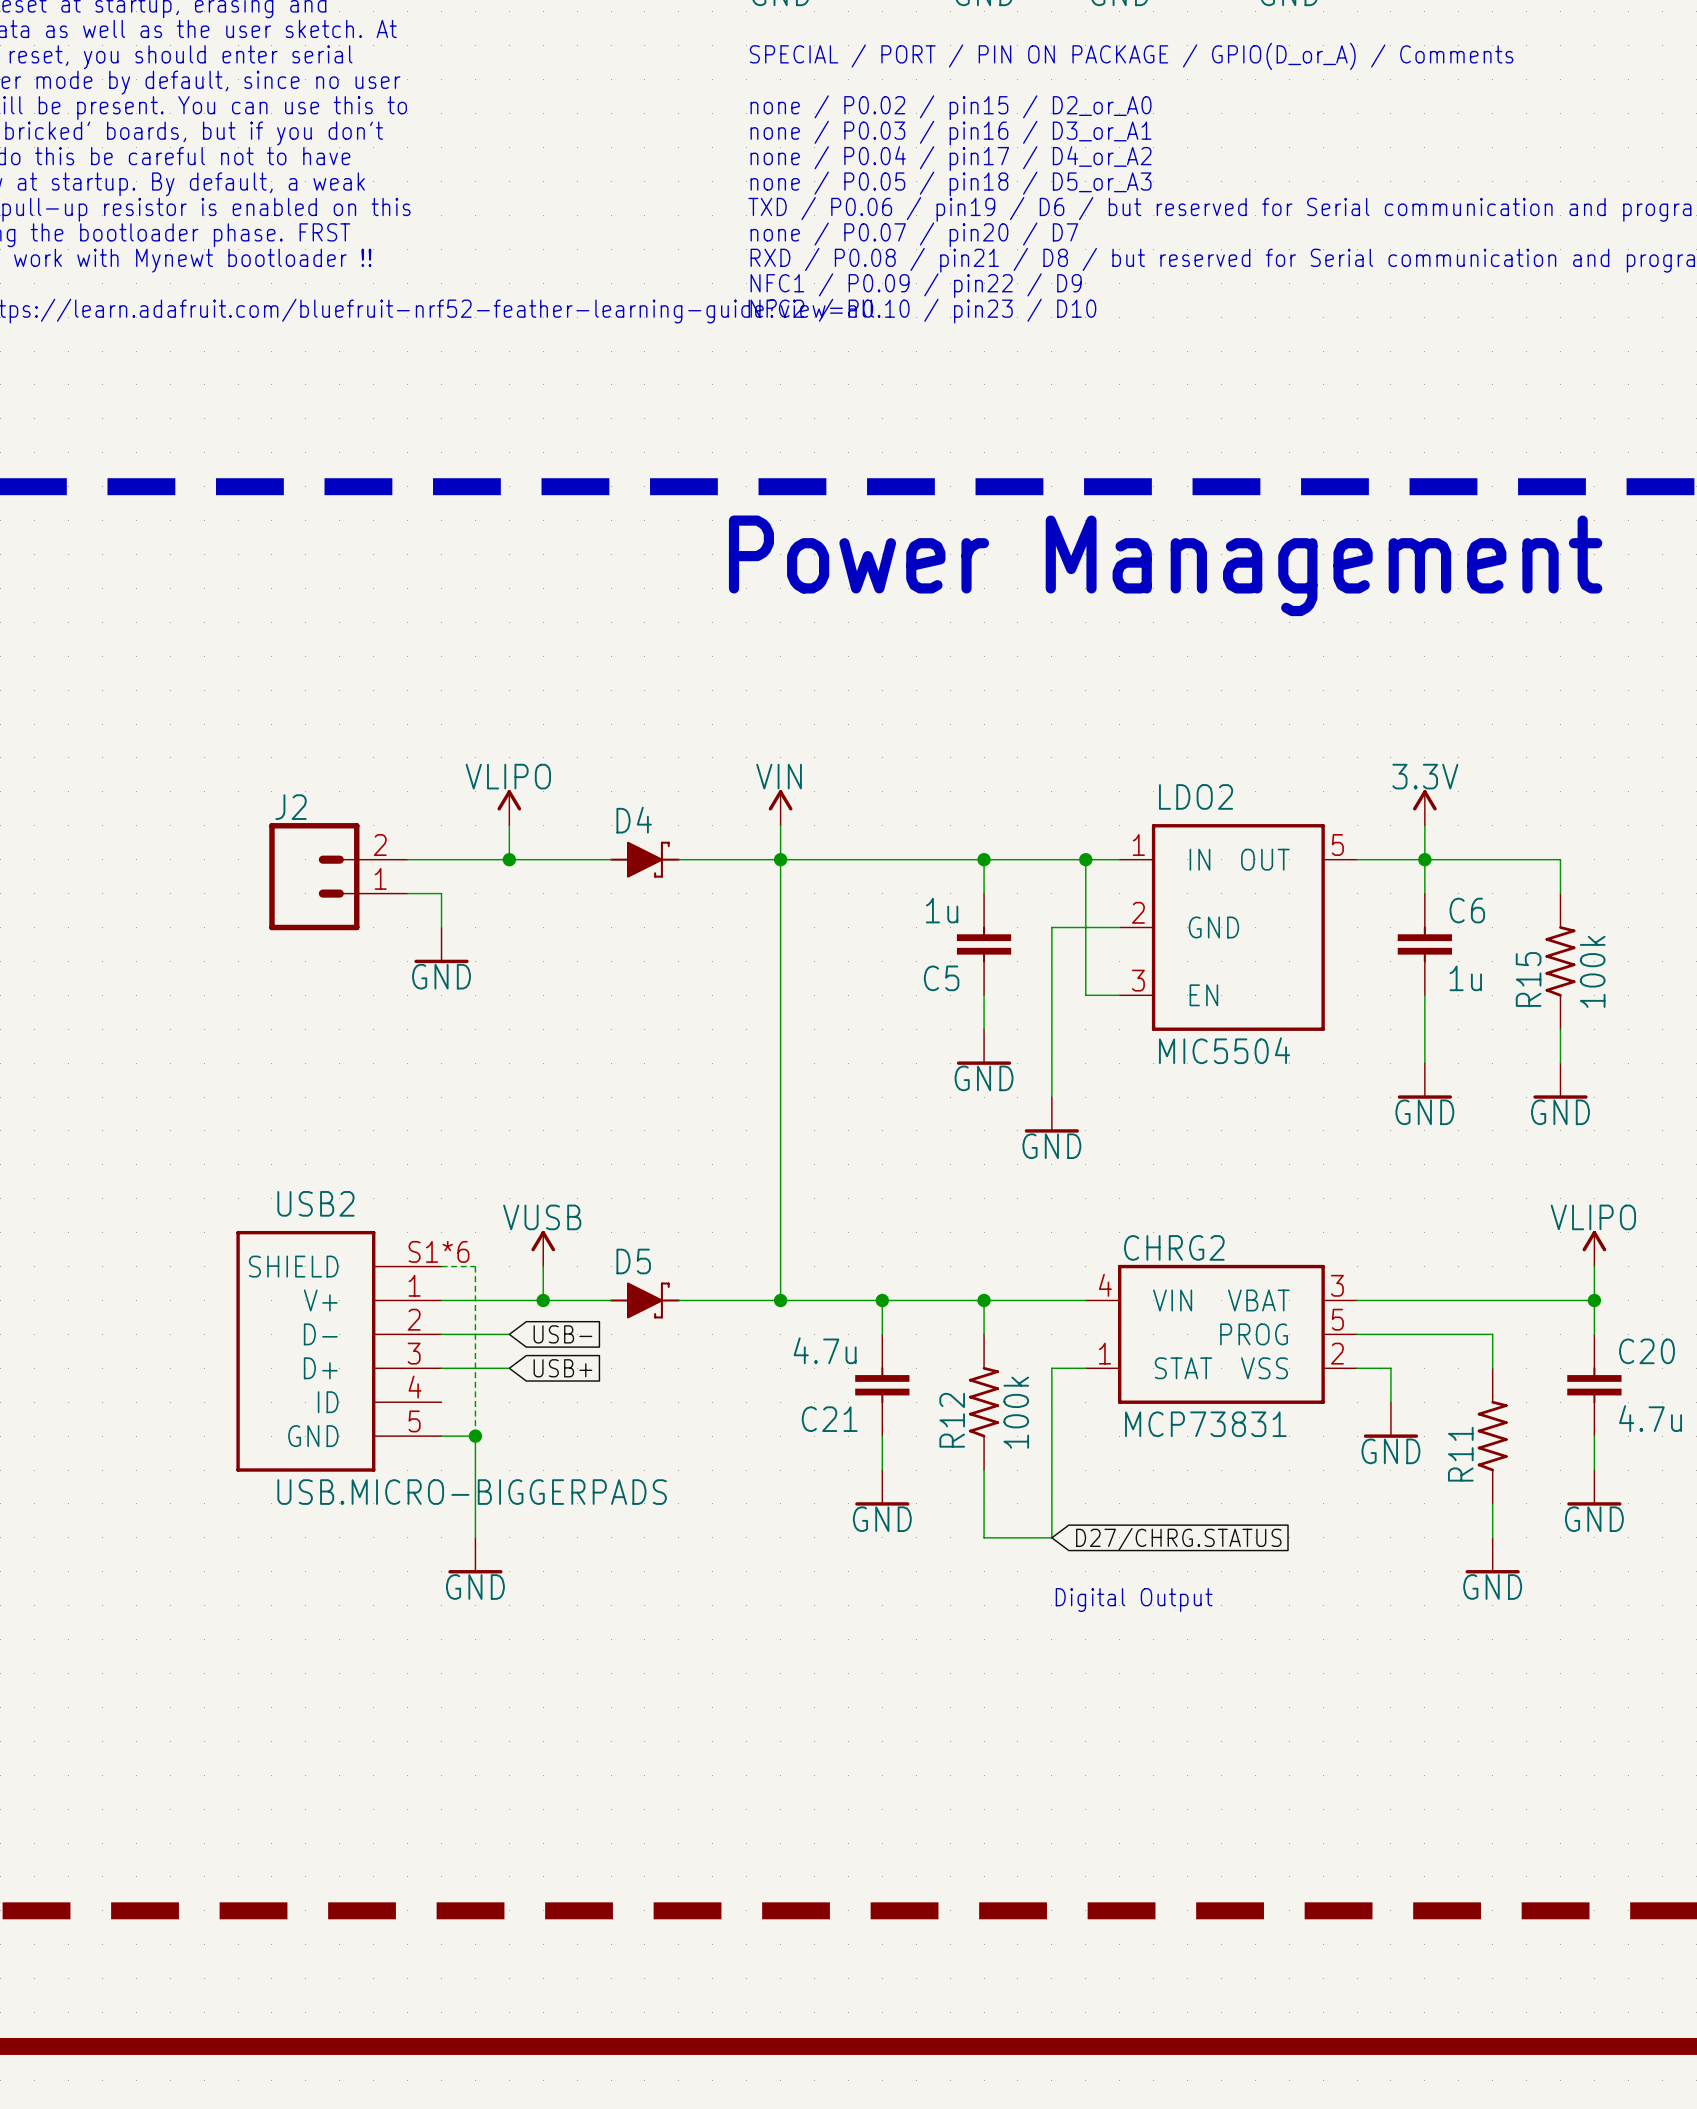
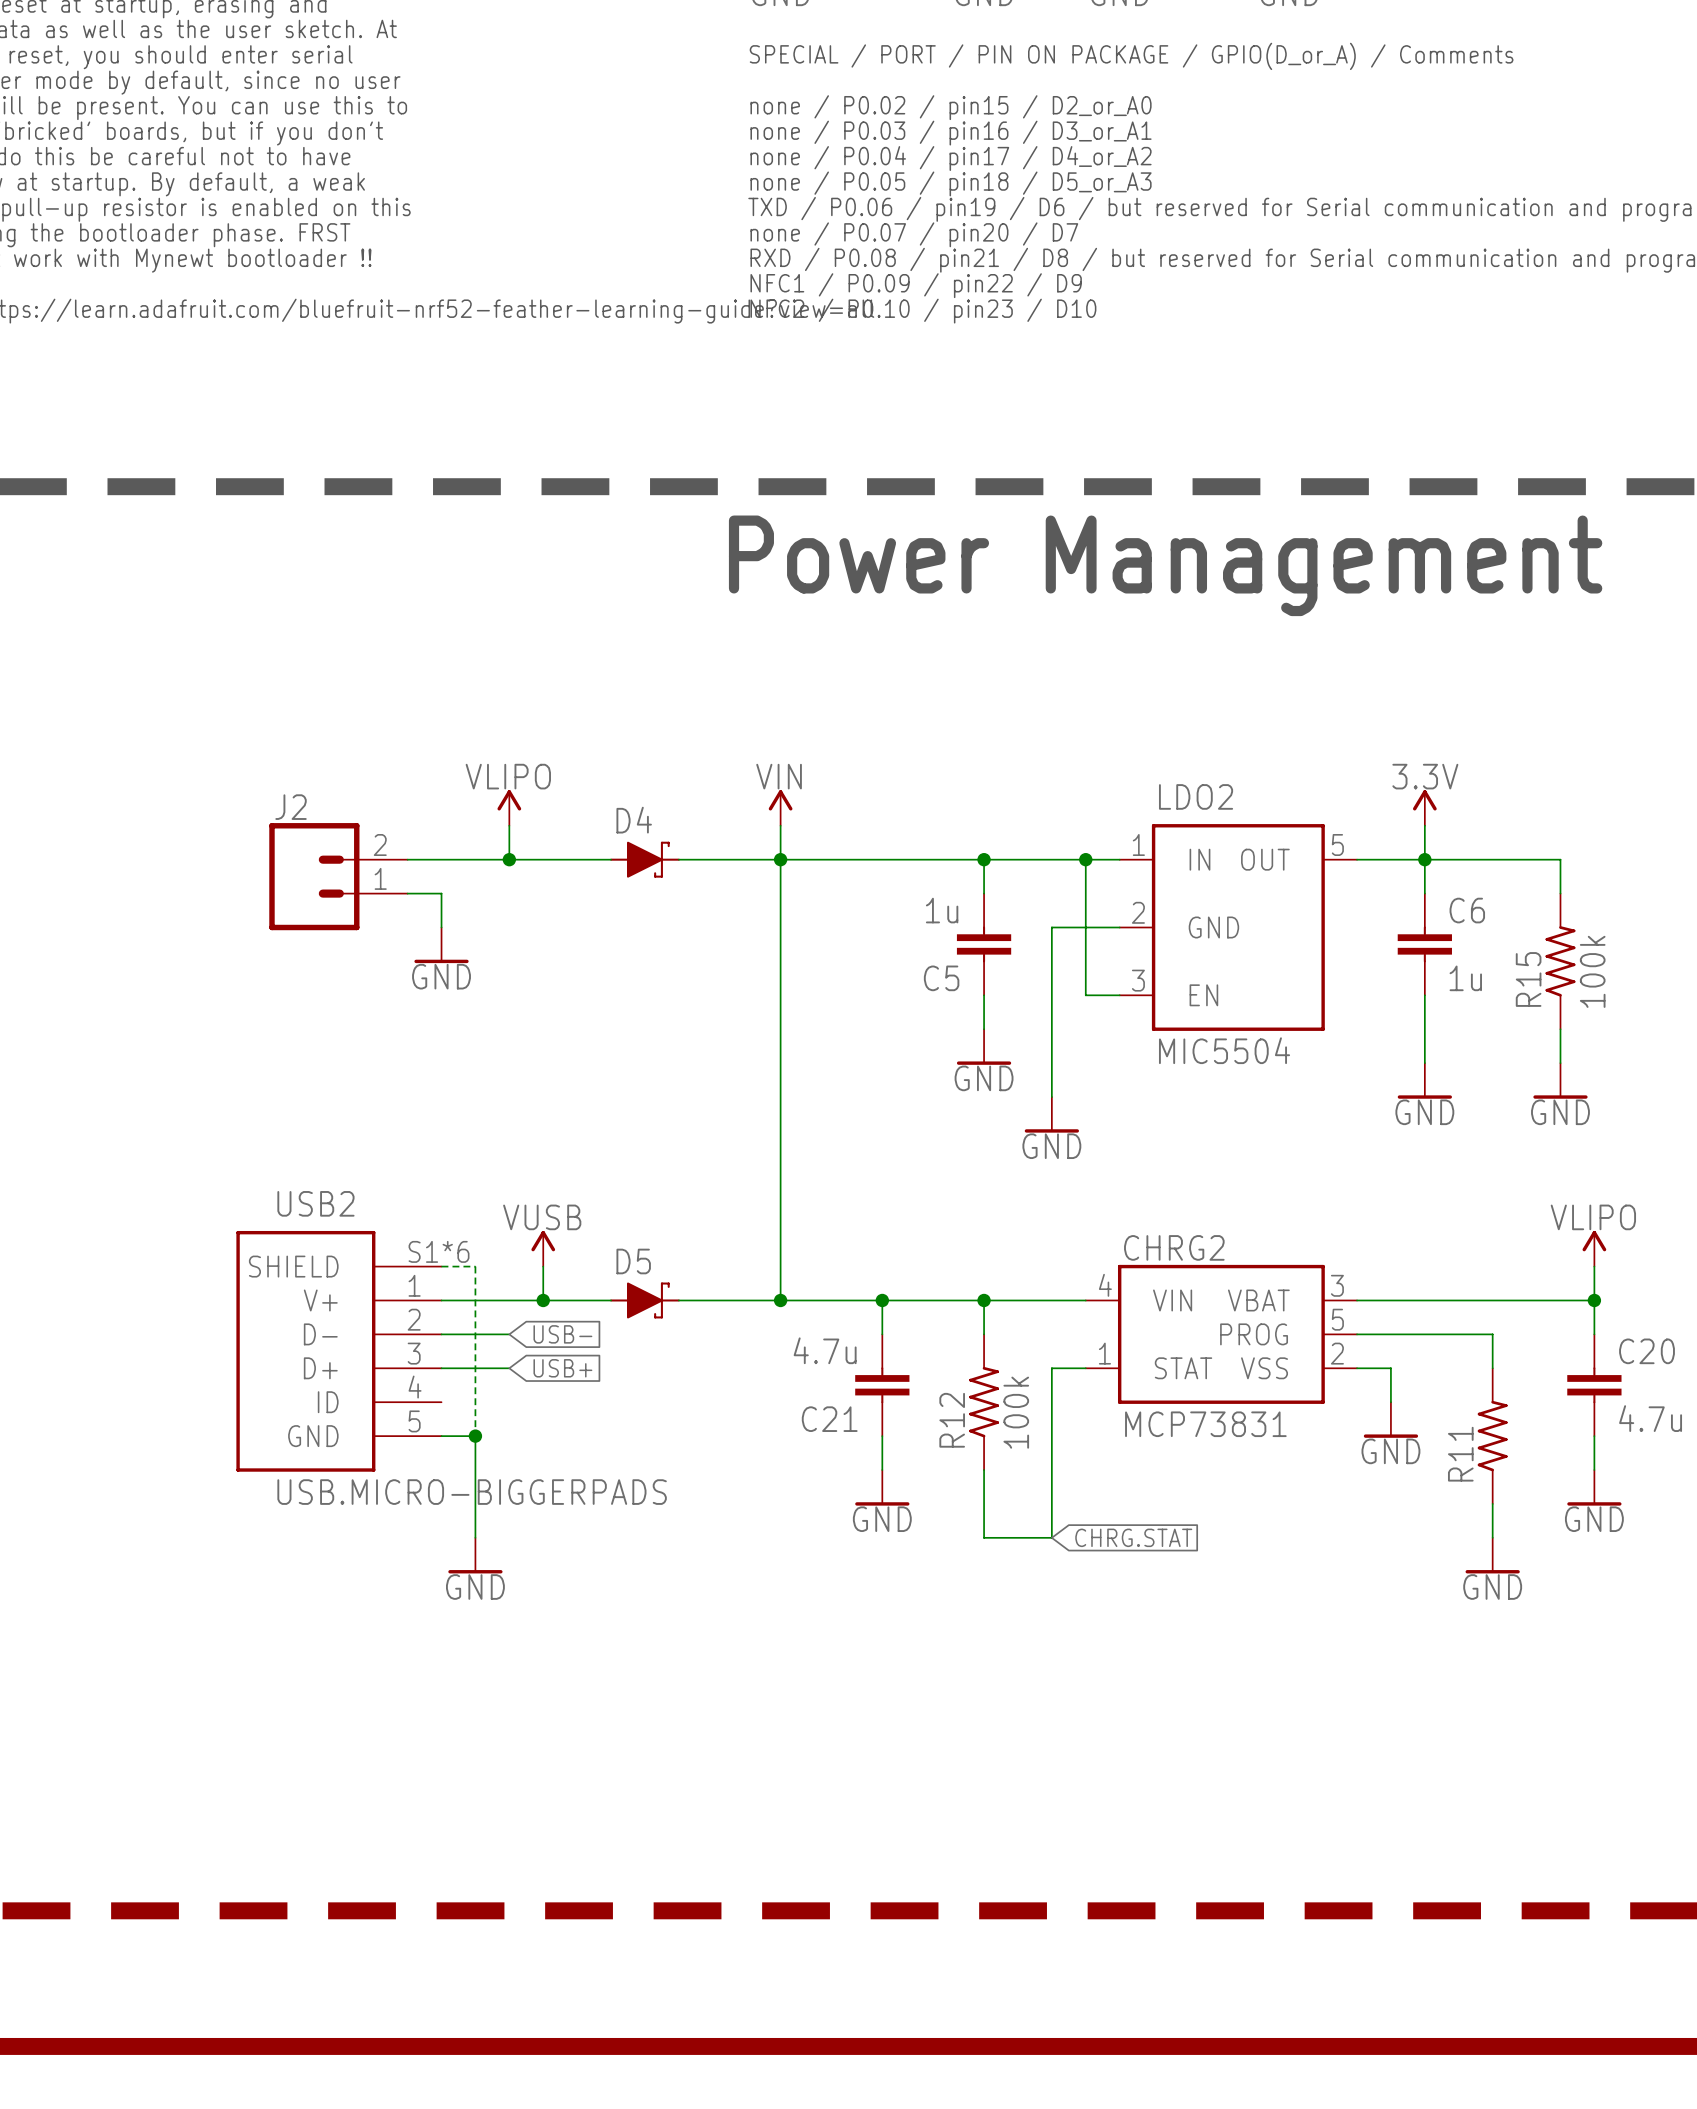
global label: D27/CHRG.STATUS (1178, 1539) -> CHRG.STAT (1133, 1537)
text: Digital Output (1134, 1600) -> none

